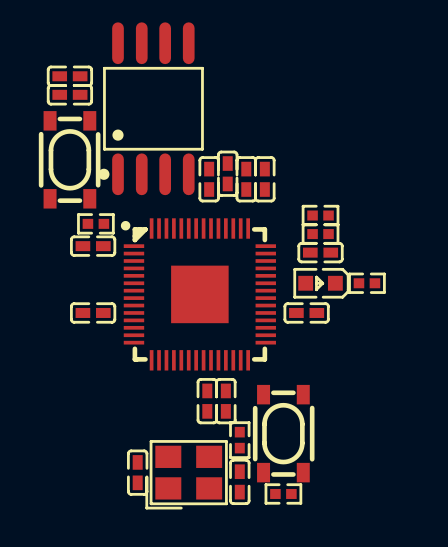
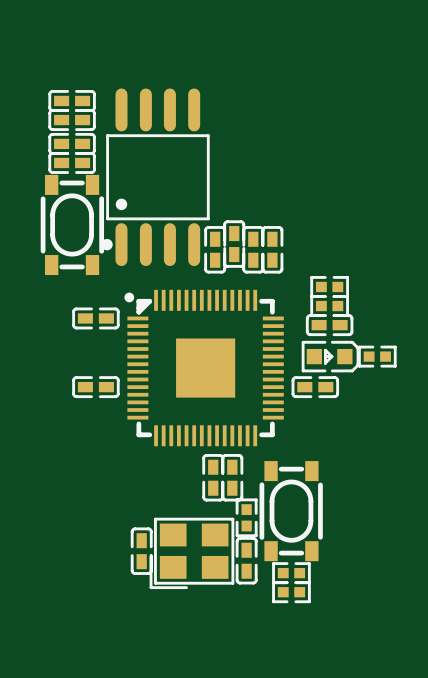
part: none -> (72, 100)
part: none -> (72, 120)
part rotation: 0° (69, 159) -> 180° (72, 224)
part position: (95, 223) -> (291, 592)
part rotation: 0° (283, 433) -> 180° (291, 511)

